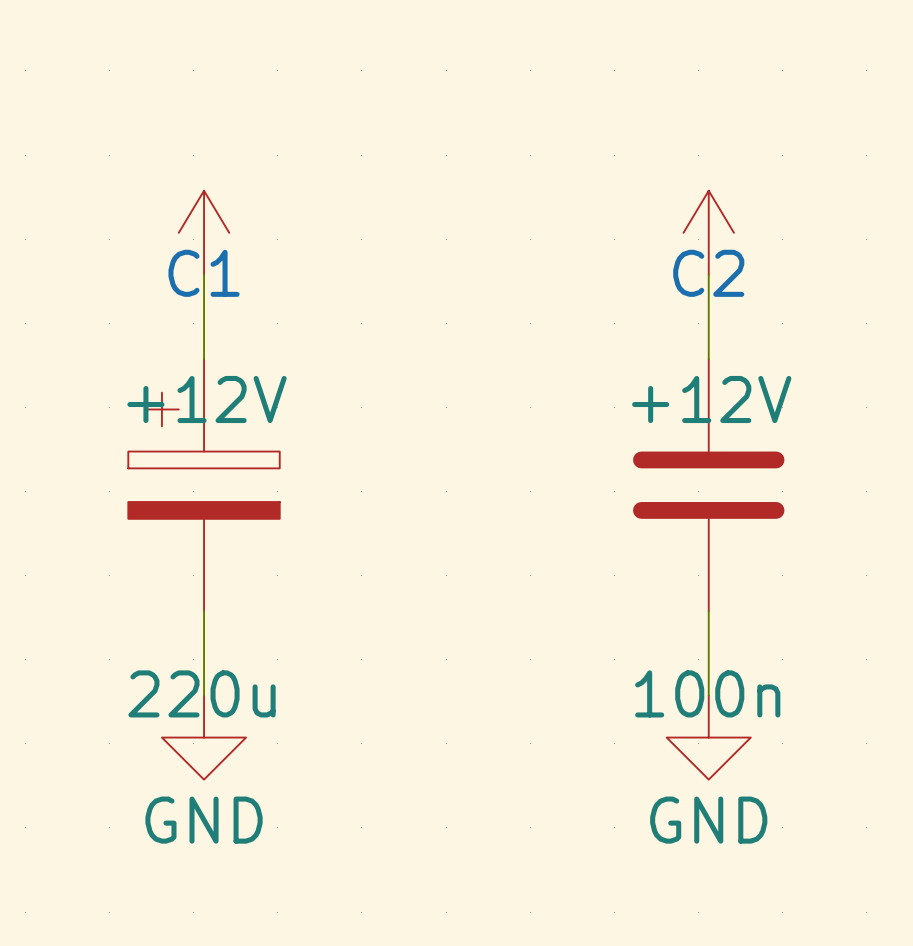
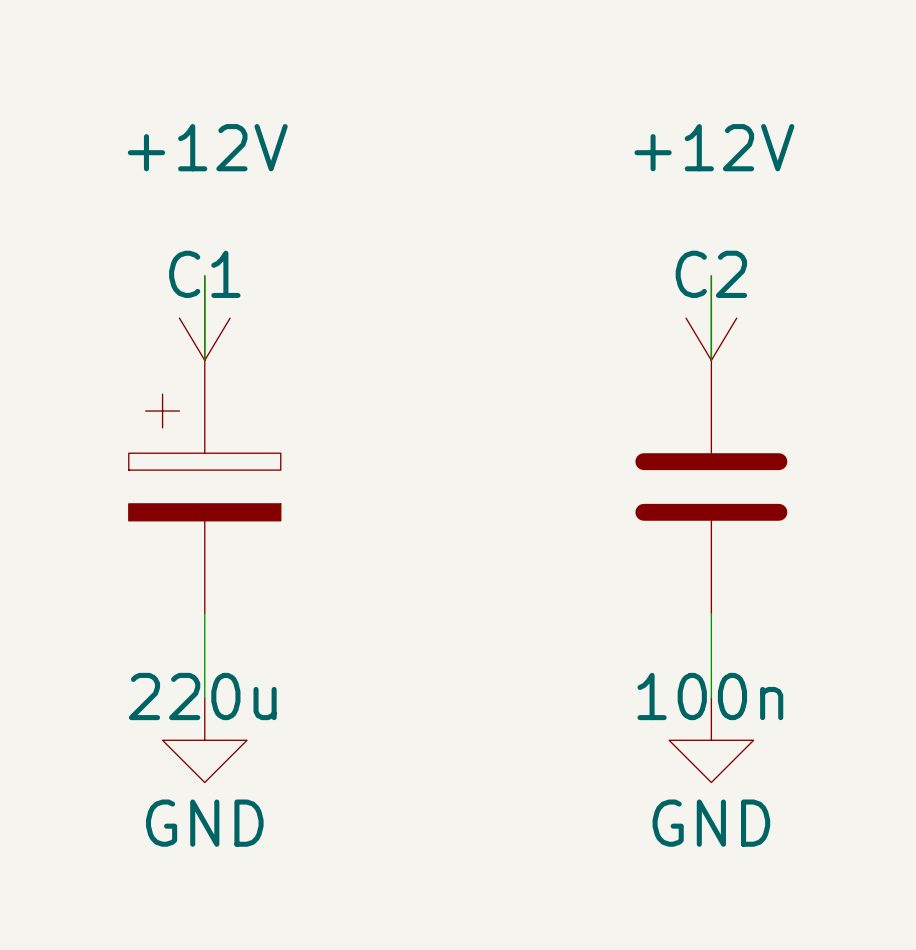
power symbol rotation: 0° (204, 232) -> 180° (204, 318)
power symbol position: +12V (204, 232) -> +12V (204, 318)
power symbol rotation: 0° (708, 232) -> 180° (711, 318)
power symbol position: +12V (708, 232) -> +12V (711, 318)

